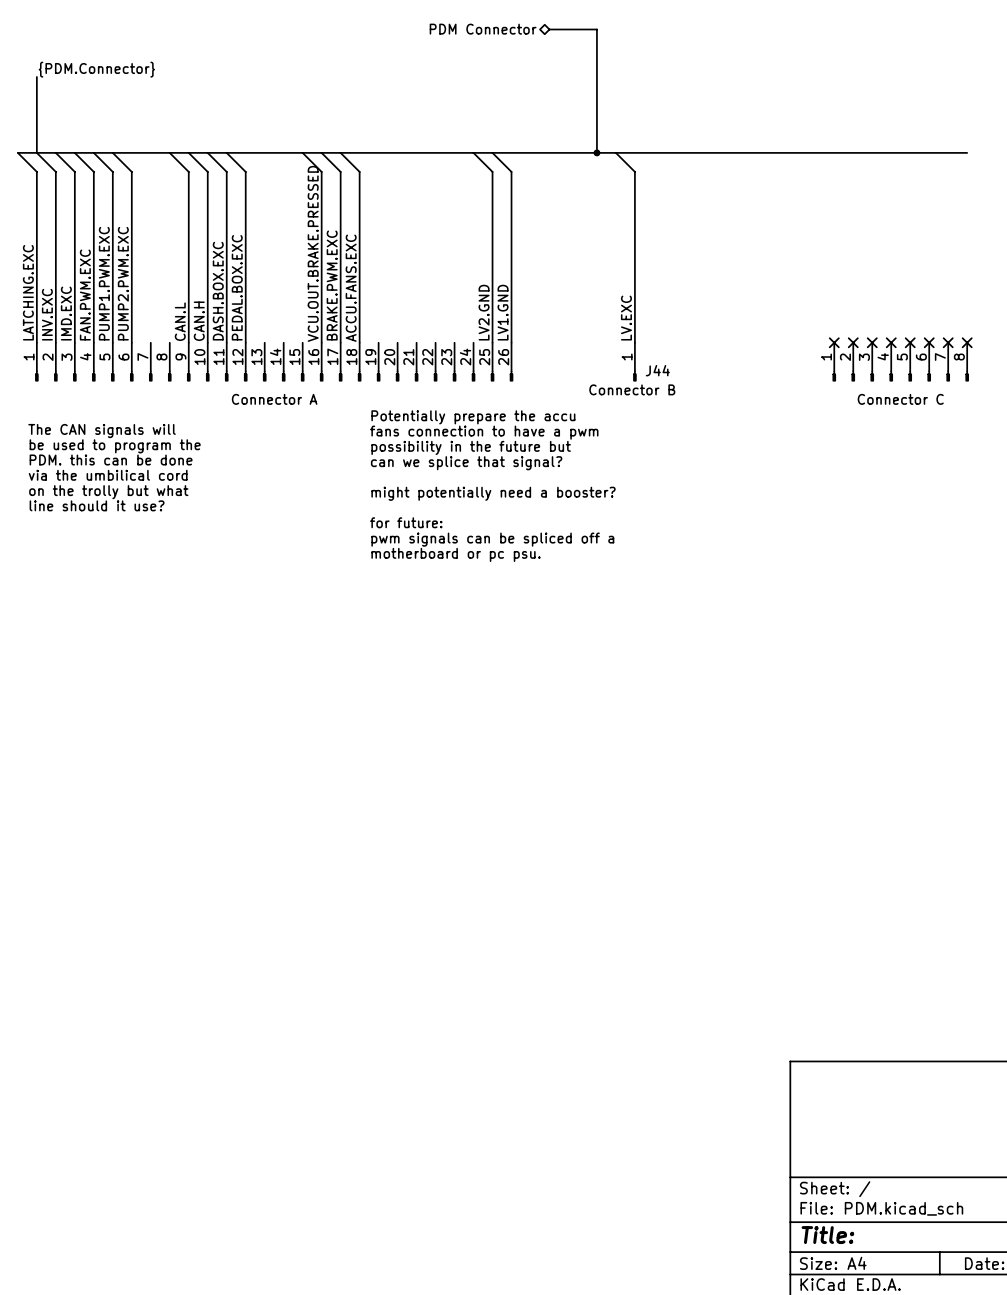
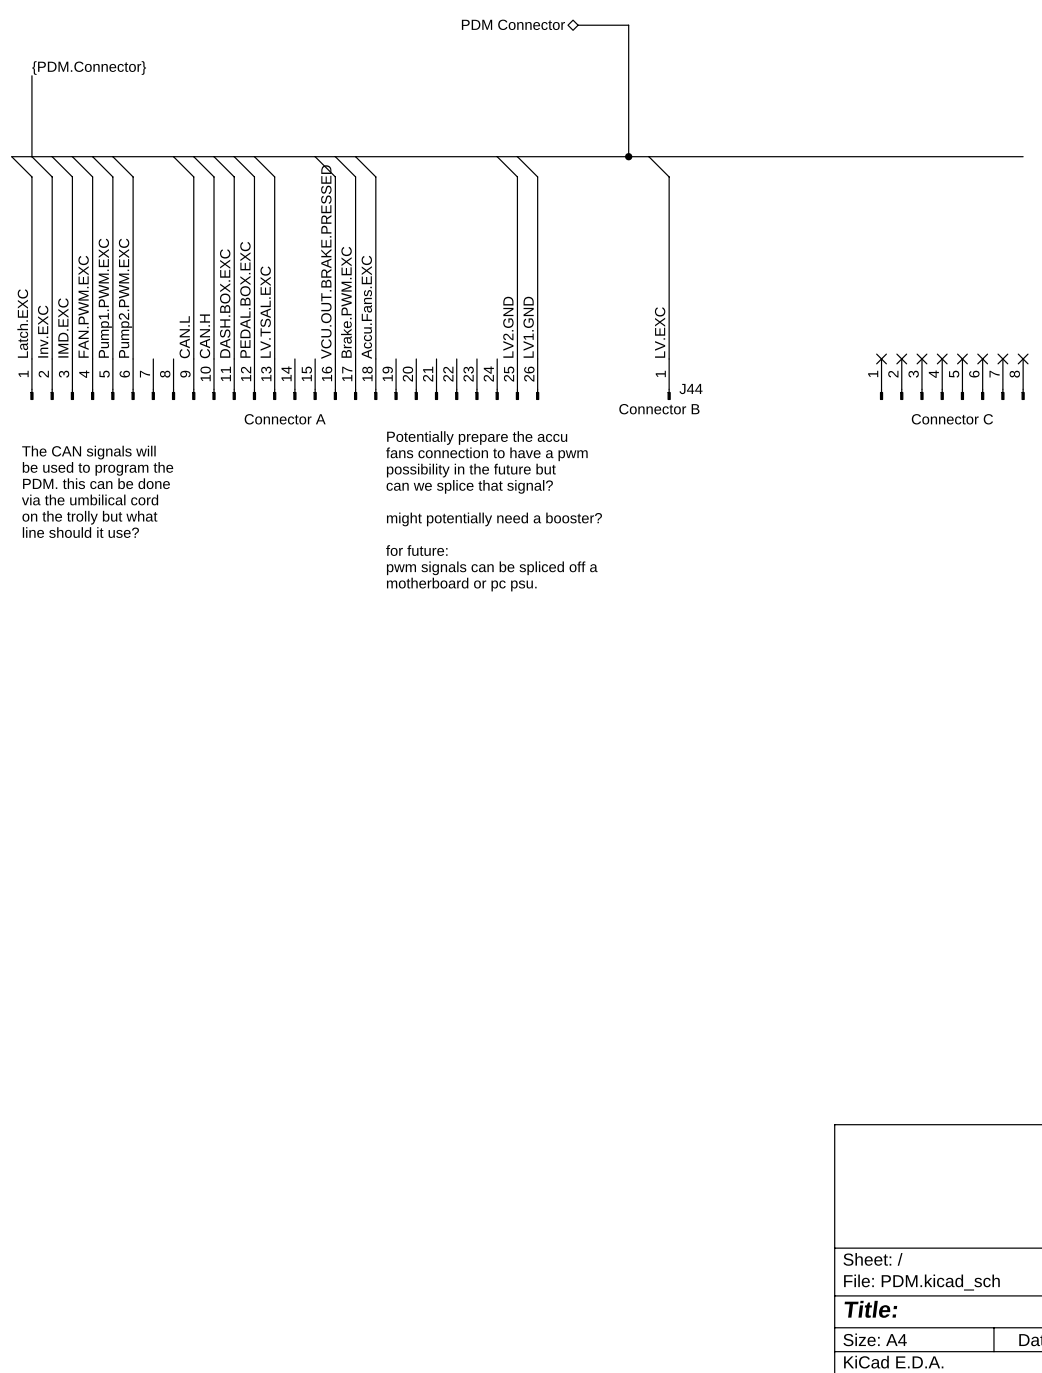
wire: none -> (254, 156) (274, 176) (274, 358)
label: PUMP1.PWM.EXC (104, 283) -> Pump1.PWM.EXC (105, 298)
label: PUMP2.PWM.EXC (123, 283) -> Pump2.PWM.EXC (125, 298)
label: BRAKE.PWM.EXC (332, 285) -> Brake.PWM.EXC (346, 302)
label: ACCU.FANS.EXC (351, 288) -> Accu.Fans.EXC (366, 307)
label: LATCHING.EXC (28, 292) -> Latch.EXC (22, 323)
label: none -> LV.TSAL.EXC (265, 312)
label: INV.EXC (47, 314) -> Inv.EXC (43, 331)

